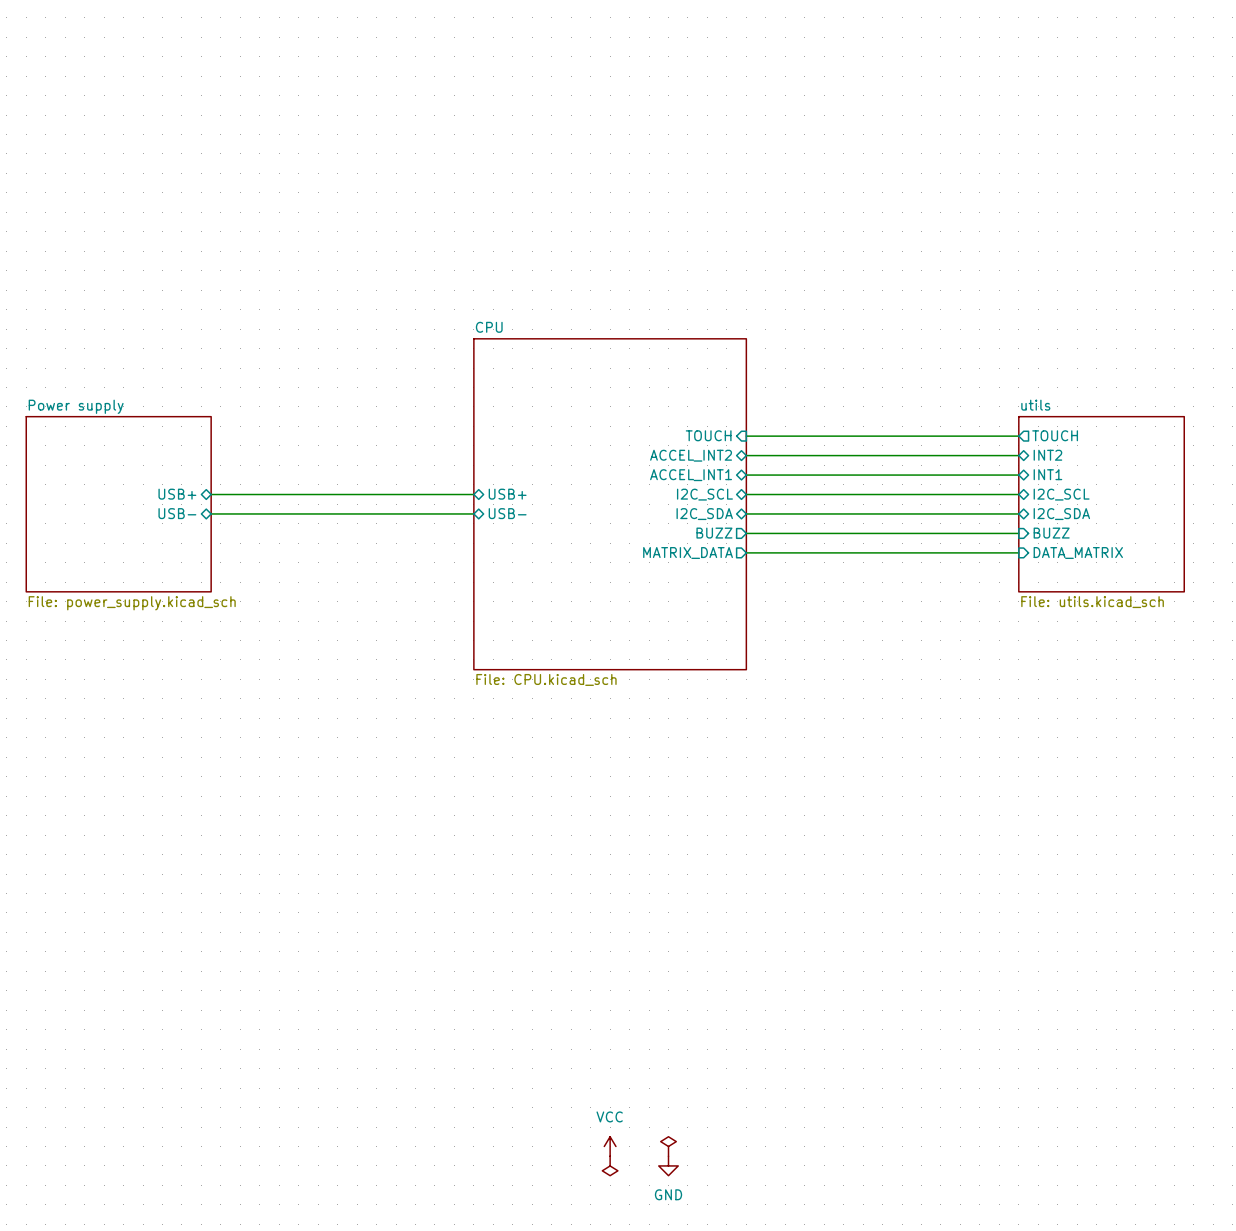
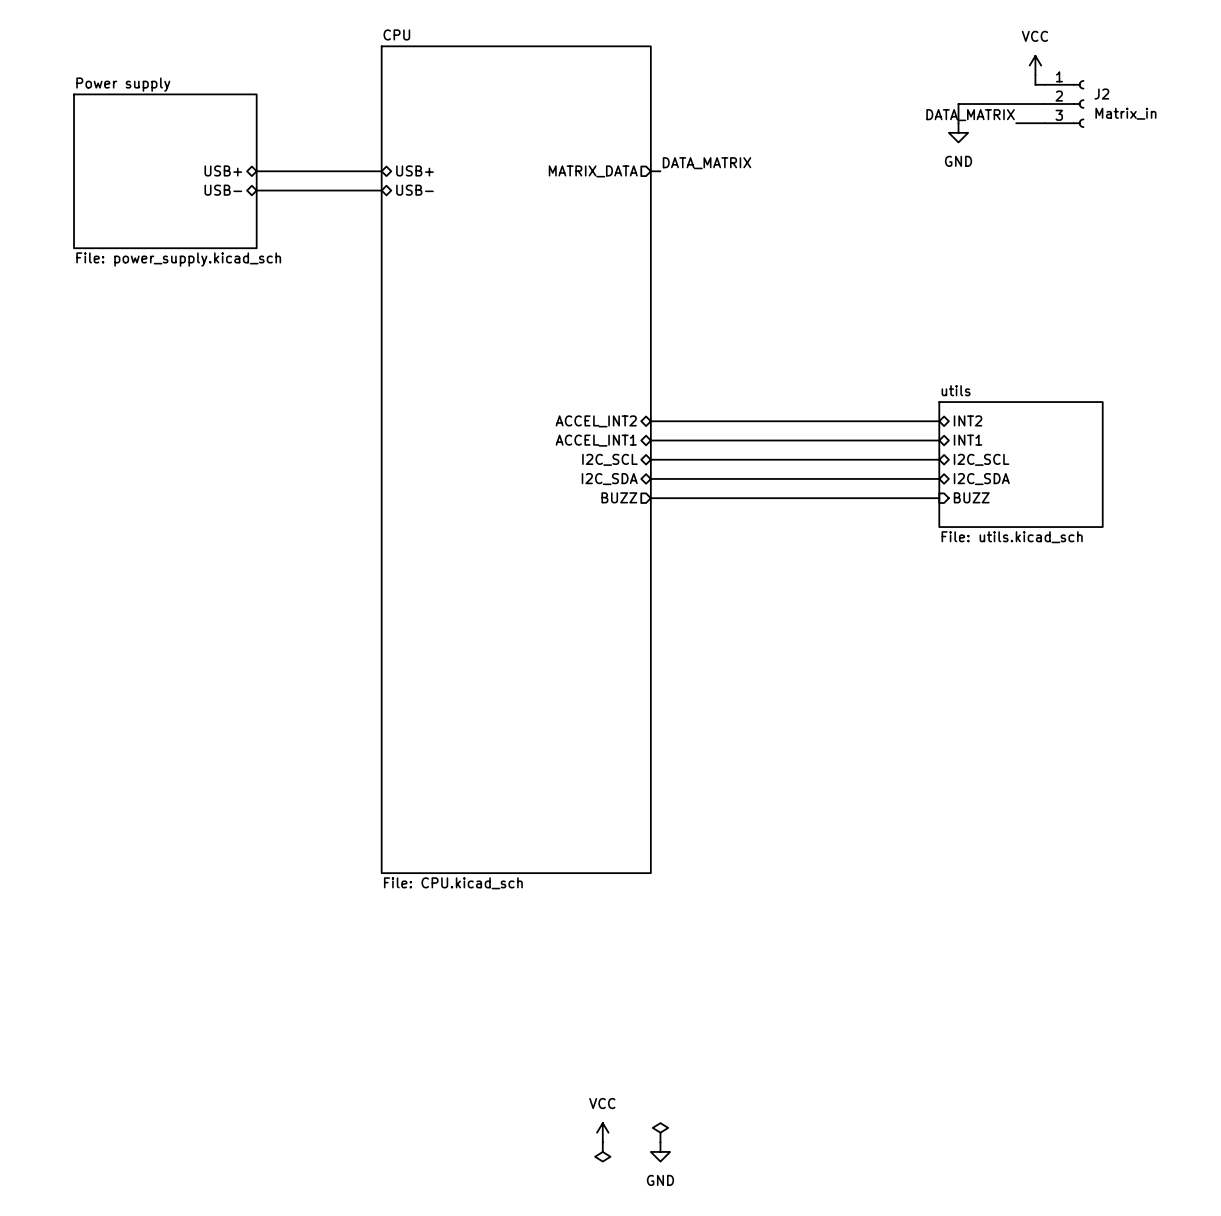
power symbol: none -> VCC (1035, 65)
wire: none -> (1035, 75) (1035, 84) (1045, 84)
wire: none -> (1045, 104) (958, 104) (958, 123)
J2: none -> Matrix_in (1064, 104)
label: none -> DATA_MATRIX (970, 115)
wire: none -> (1016, 123) (1045, 123)
power symbol: none -> GND (958, 132)
label: none -> DATA_MATRIX (707, 163)
sheet Power supply: none -> File: power_supply.kicad_sch (165, 171)
sheet pin: none -> USB+ (223, 170)
wire: none -> (256, 171) (381, 171)
sheet pin: none -> USB+ (415, 170)
sheet pin: none -> MATRIX_DATA (593, 171)
wire: none -> (650, 171) (660, 171)
sheet pin: none -> USB- (223, 190)
wire: none -> (256, 190) (381, 190)
sheet pin: none -> USB- (415, 190)
wire: none -> (650, 421) (939, 421)
sheet pin: TOUCH (708, 435) -> none
sheet pin: TOUCH (1055, 435) -> none
wire: (746, 436) (1018, 436) -> none
wire: none -> (650, 440) (939, 440)
sheet pin position: ACCEL_INT2 (691, 455) -> ACCEL_INT2 (596, 421)
wire: (746, 455) (1018, 455) -> none
sheet pin position: INT2 (1047, 455) -> INT2 (968, 420)
sheet CPU: none -> File: CPU.kicad_sch (516, 459)
wire: none -> (650, 459) (939, 459)
sheet utils: none -> File: utils.kicad_sch (1021, 464)
sheet pin position: INT1 (1047, 474) -> INT1 (968, 440)
sheet pin position: ACCEL_INT1 (691, 475) -> ACCEL_INT1 (596, 440)
wire: (746, 475) (1018, 475) -> none
wire: none -> (650, 478) (939, 478)
sheet pin: USB+ (177, 494) -> none
wire: (211, 494) (473, 494) -> none
sheet pin: USB+ (507, 494) -> none
sheet pin position: I2C_SCL (704, 494) -> I2C_SCL (609, 459)
wire: (746, 494) (1018, 494) -> none
sheet pin position: I2C_SCL (1061, 494) -> I2C_SCL (981, 459)
sheet Power supply: File: power_supply.kicad_sch (118, 504) -> none
sheet CPU: File: CPU.kicad_sch (610, 504) -> none
wire: none -> (650, 498) (939, 498)
sheet utils: File: utils.kicad_sch (1101, 504) -> none
sheet pin: USB- (177, 513) -> none
wire: (211, 513) (473, 513) -> none
sheet pin: USB- (507, 513) -> none
wire: (746, 513) (1018, 513) -> none
sheet pin position: I2C_SDA (704, 514) -> I2C_SDA (609, 479)
sheet pin position: I2C_SDA (1061, 514) -> I2C_SDA (981, 479)
sheet pin position: BUZZ (714, 533) -> BUZZ (619, 497)
wire: (746, 533) (1018, 533) -> none
sheet pin position: BUZZ (1051, 533) -> BUZZ (971, 497)
wire: (746, 552) (1018, 552) -> none
sheet pin: MATRIX_DATA (688, 553) -> none
sheet pin: DATA_MATRIX (1078, 553) -> none

